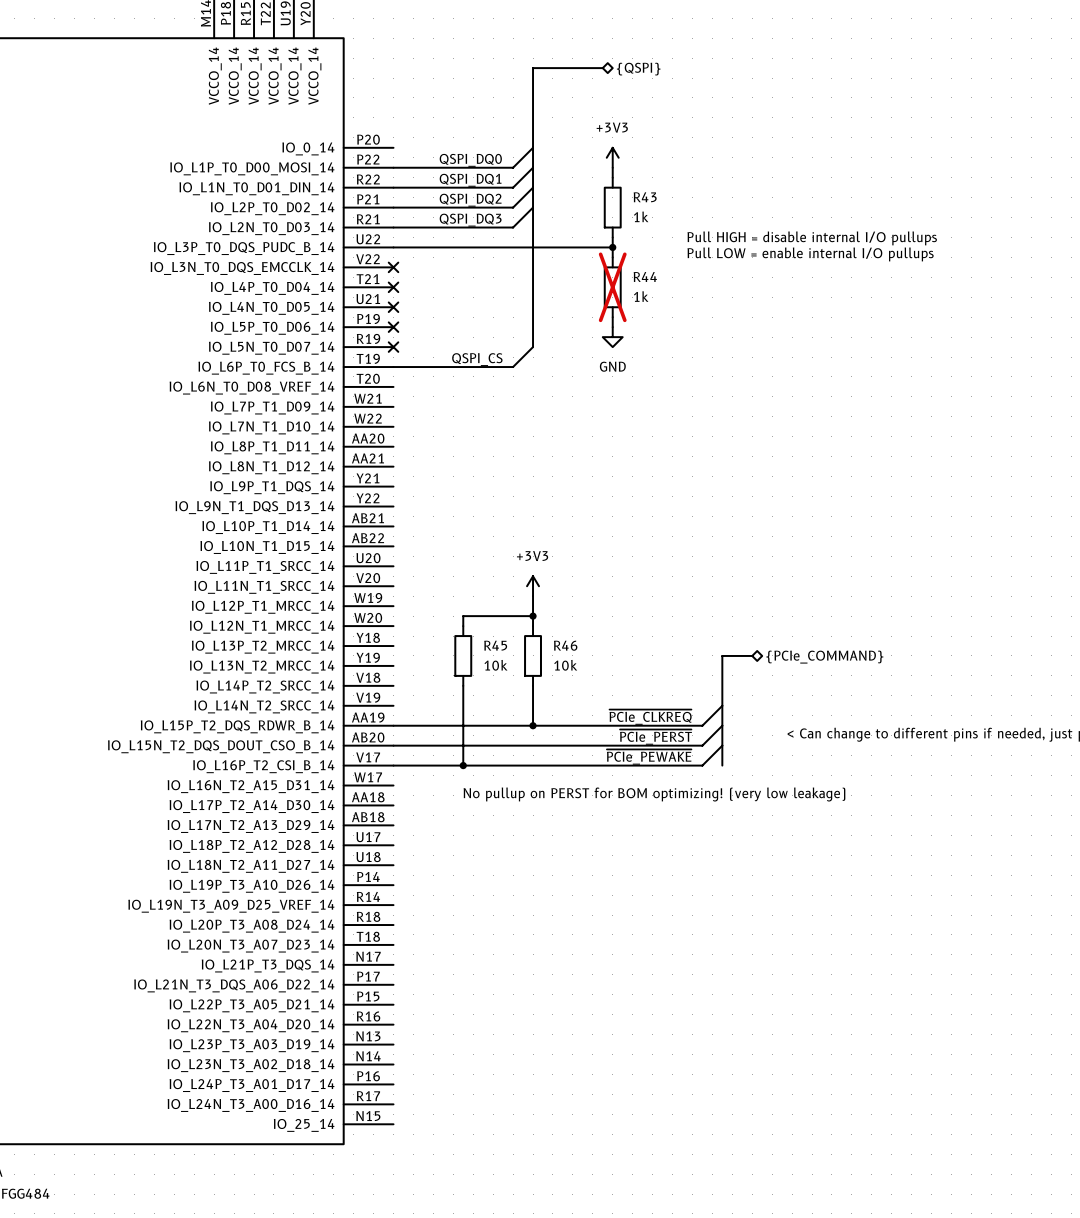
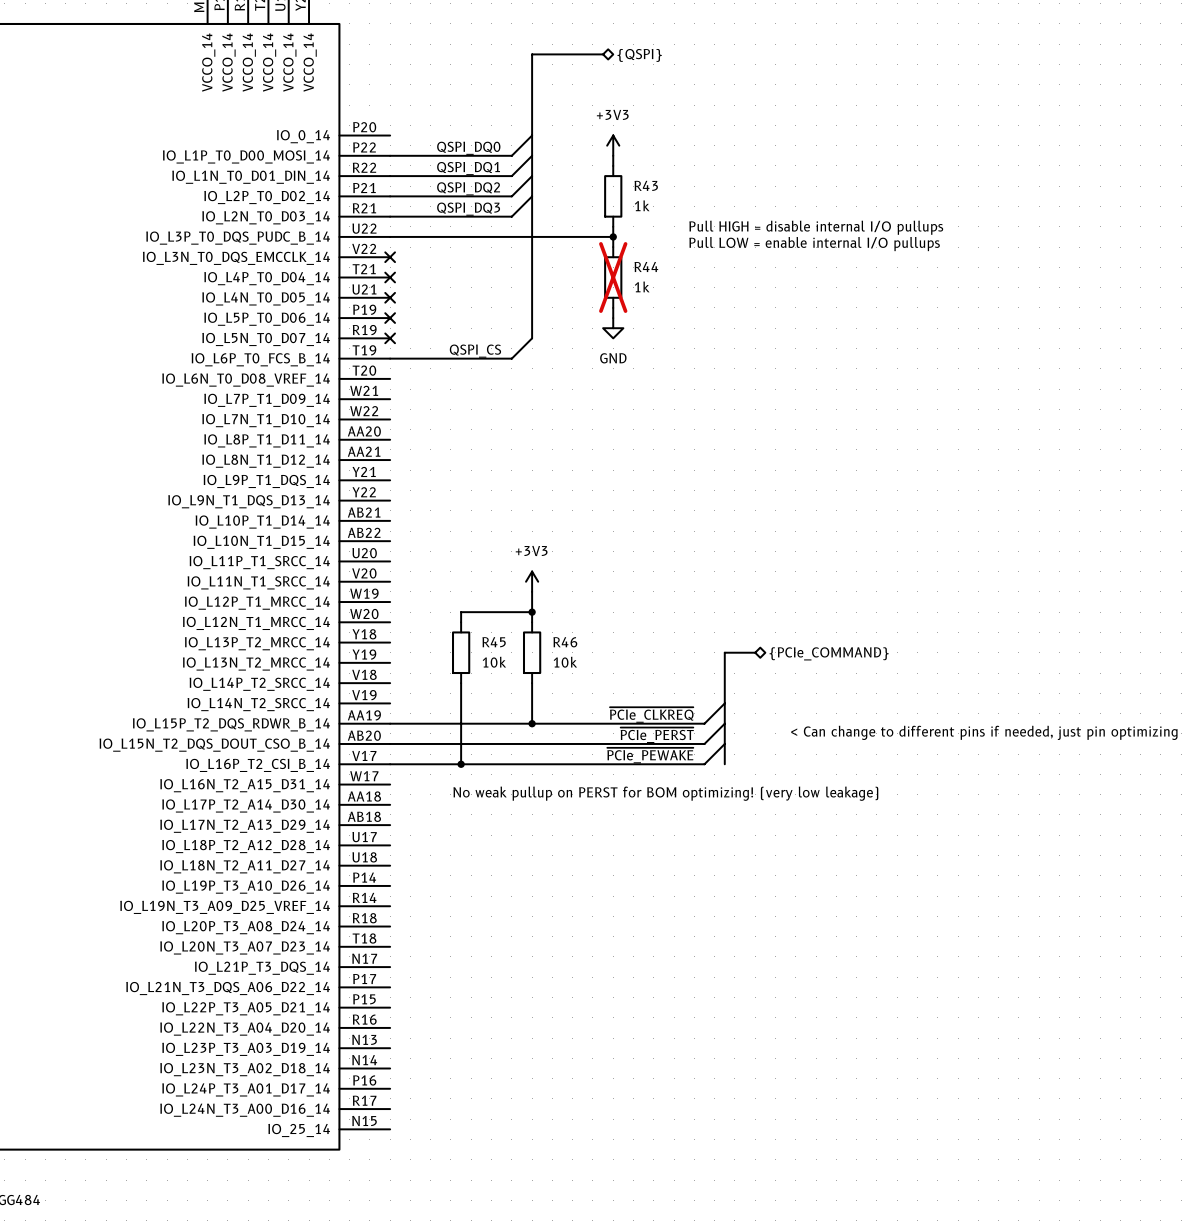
text: No pullup on PERST for BOM optimizing! (very low leakage) (654, 794) -> No weak pullup on PERST for BOM optimizing! (very low leakage) (665, 793)

